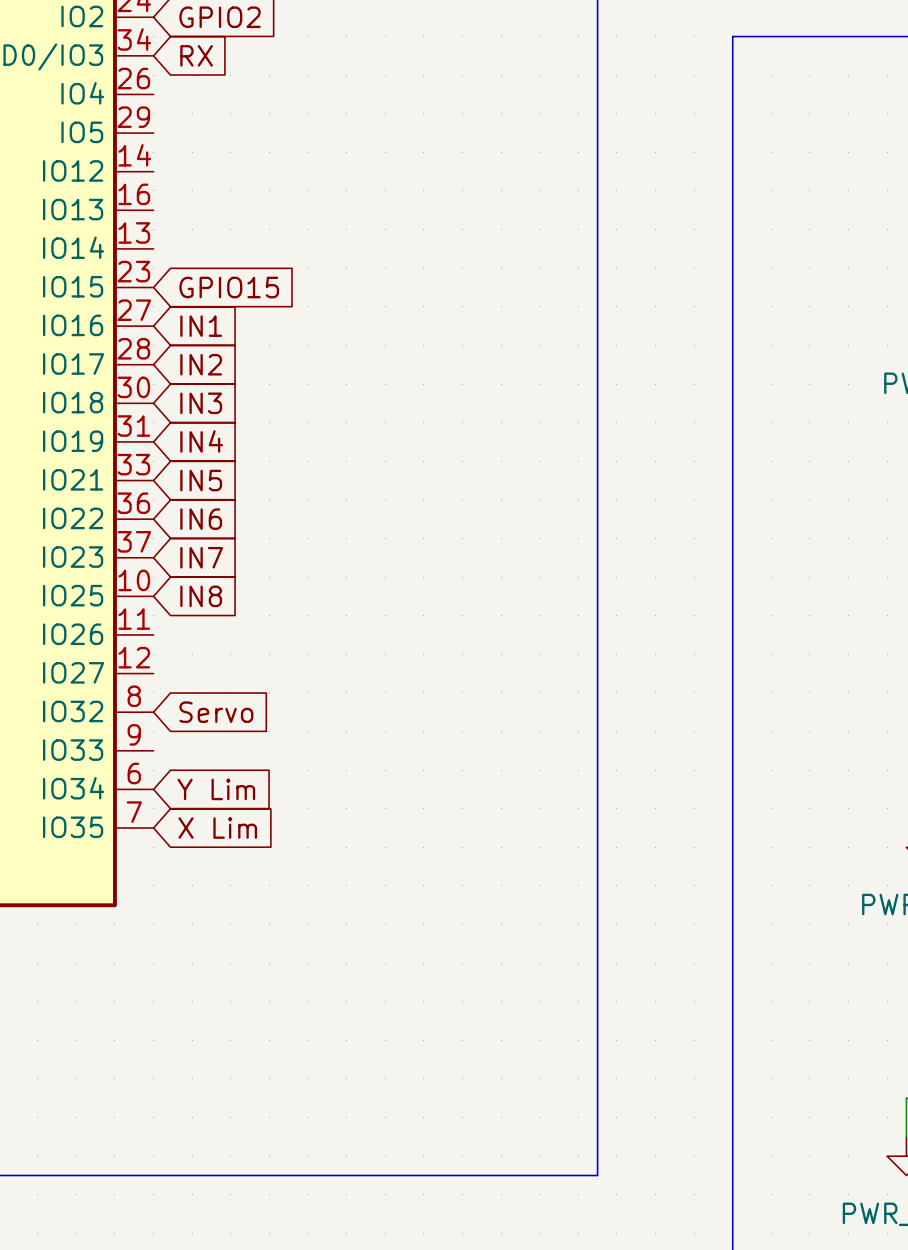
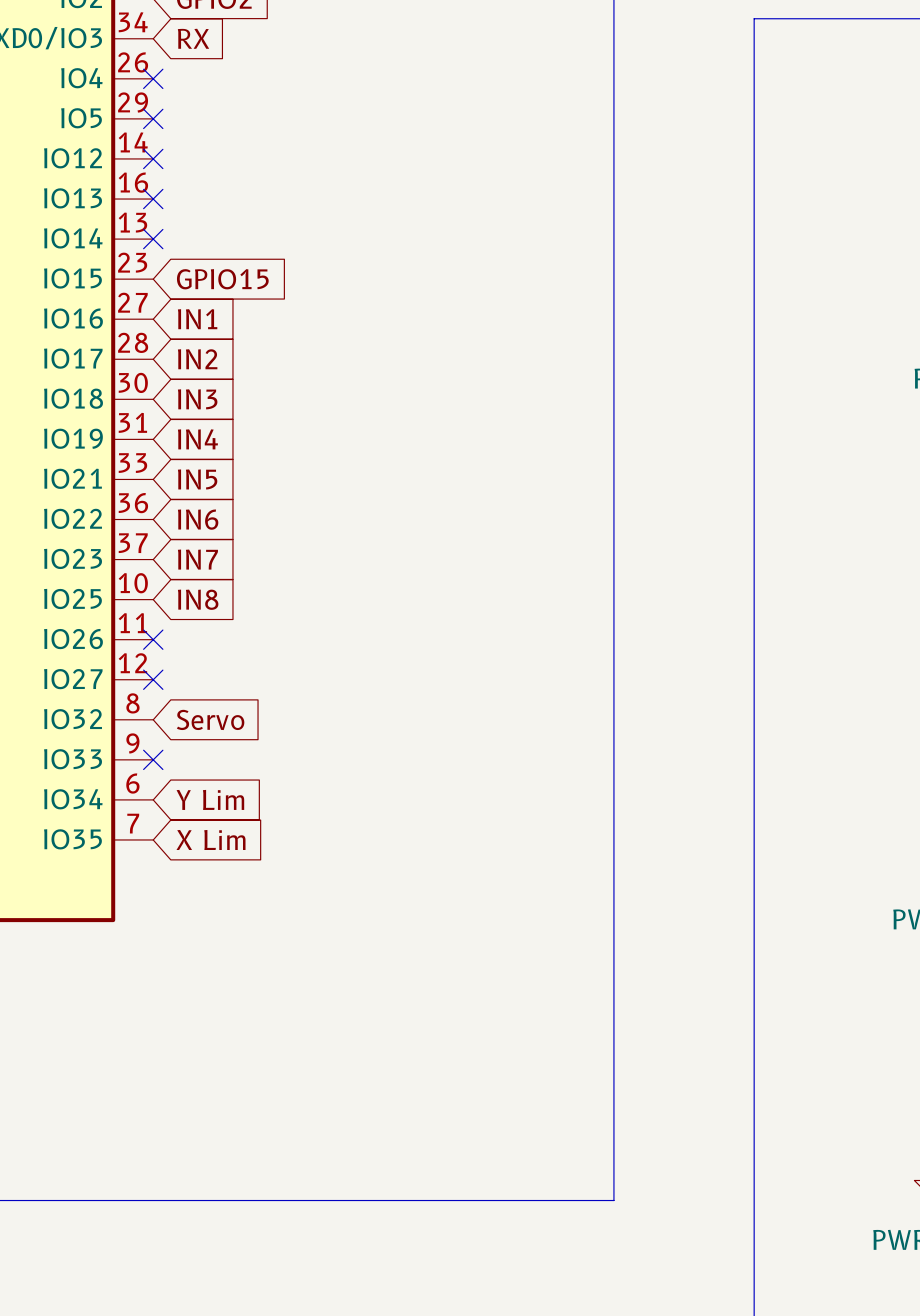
no-connect mark: none -> (153, 78)
no-connect mark: none -> (153, 118)
no-connect mark: none -> (153, 158)
no-connect mark: none -> (153, 199)
no-connect mark: none -> (153, 239)
no-connect mark: none -> (153, 639)
no-connect mark: none -> (153, 679)
no-connect mark: none -> (153, 759)

